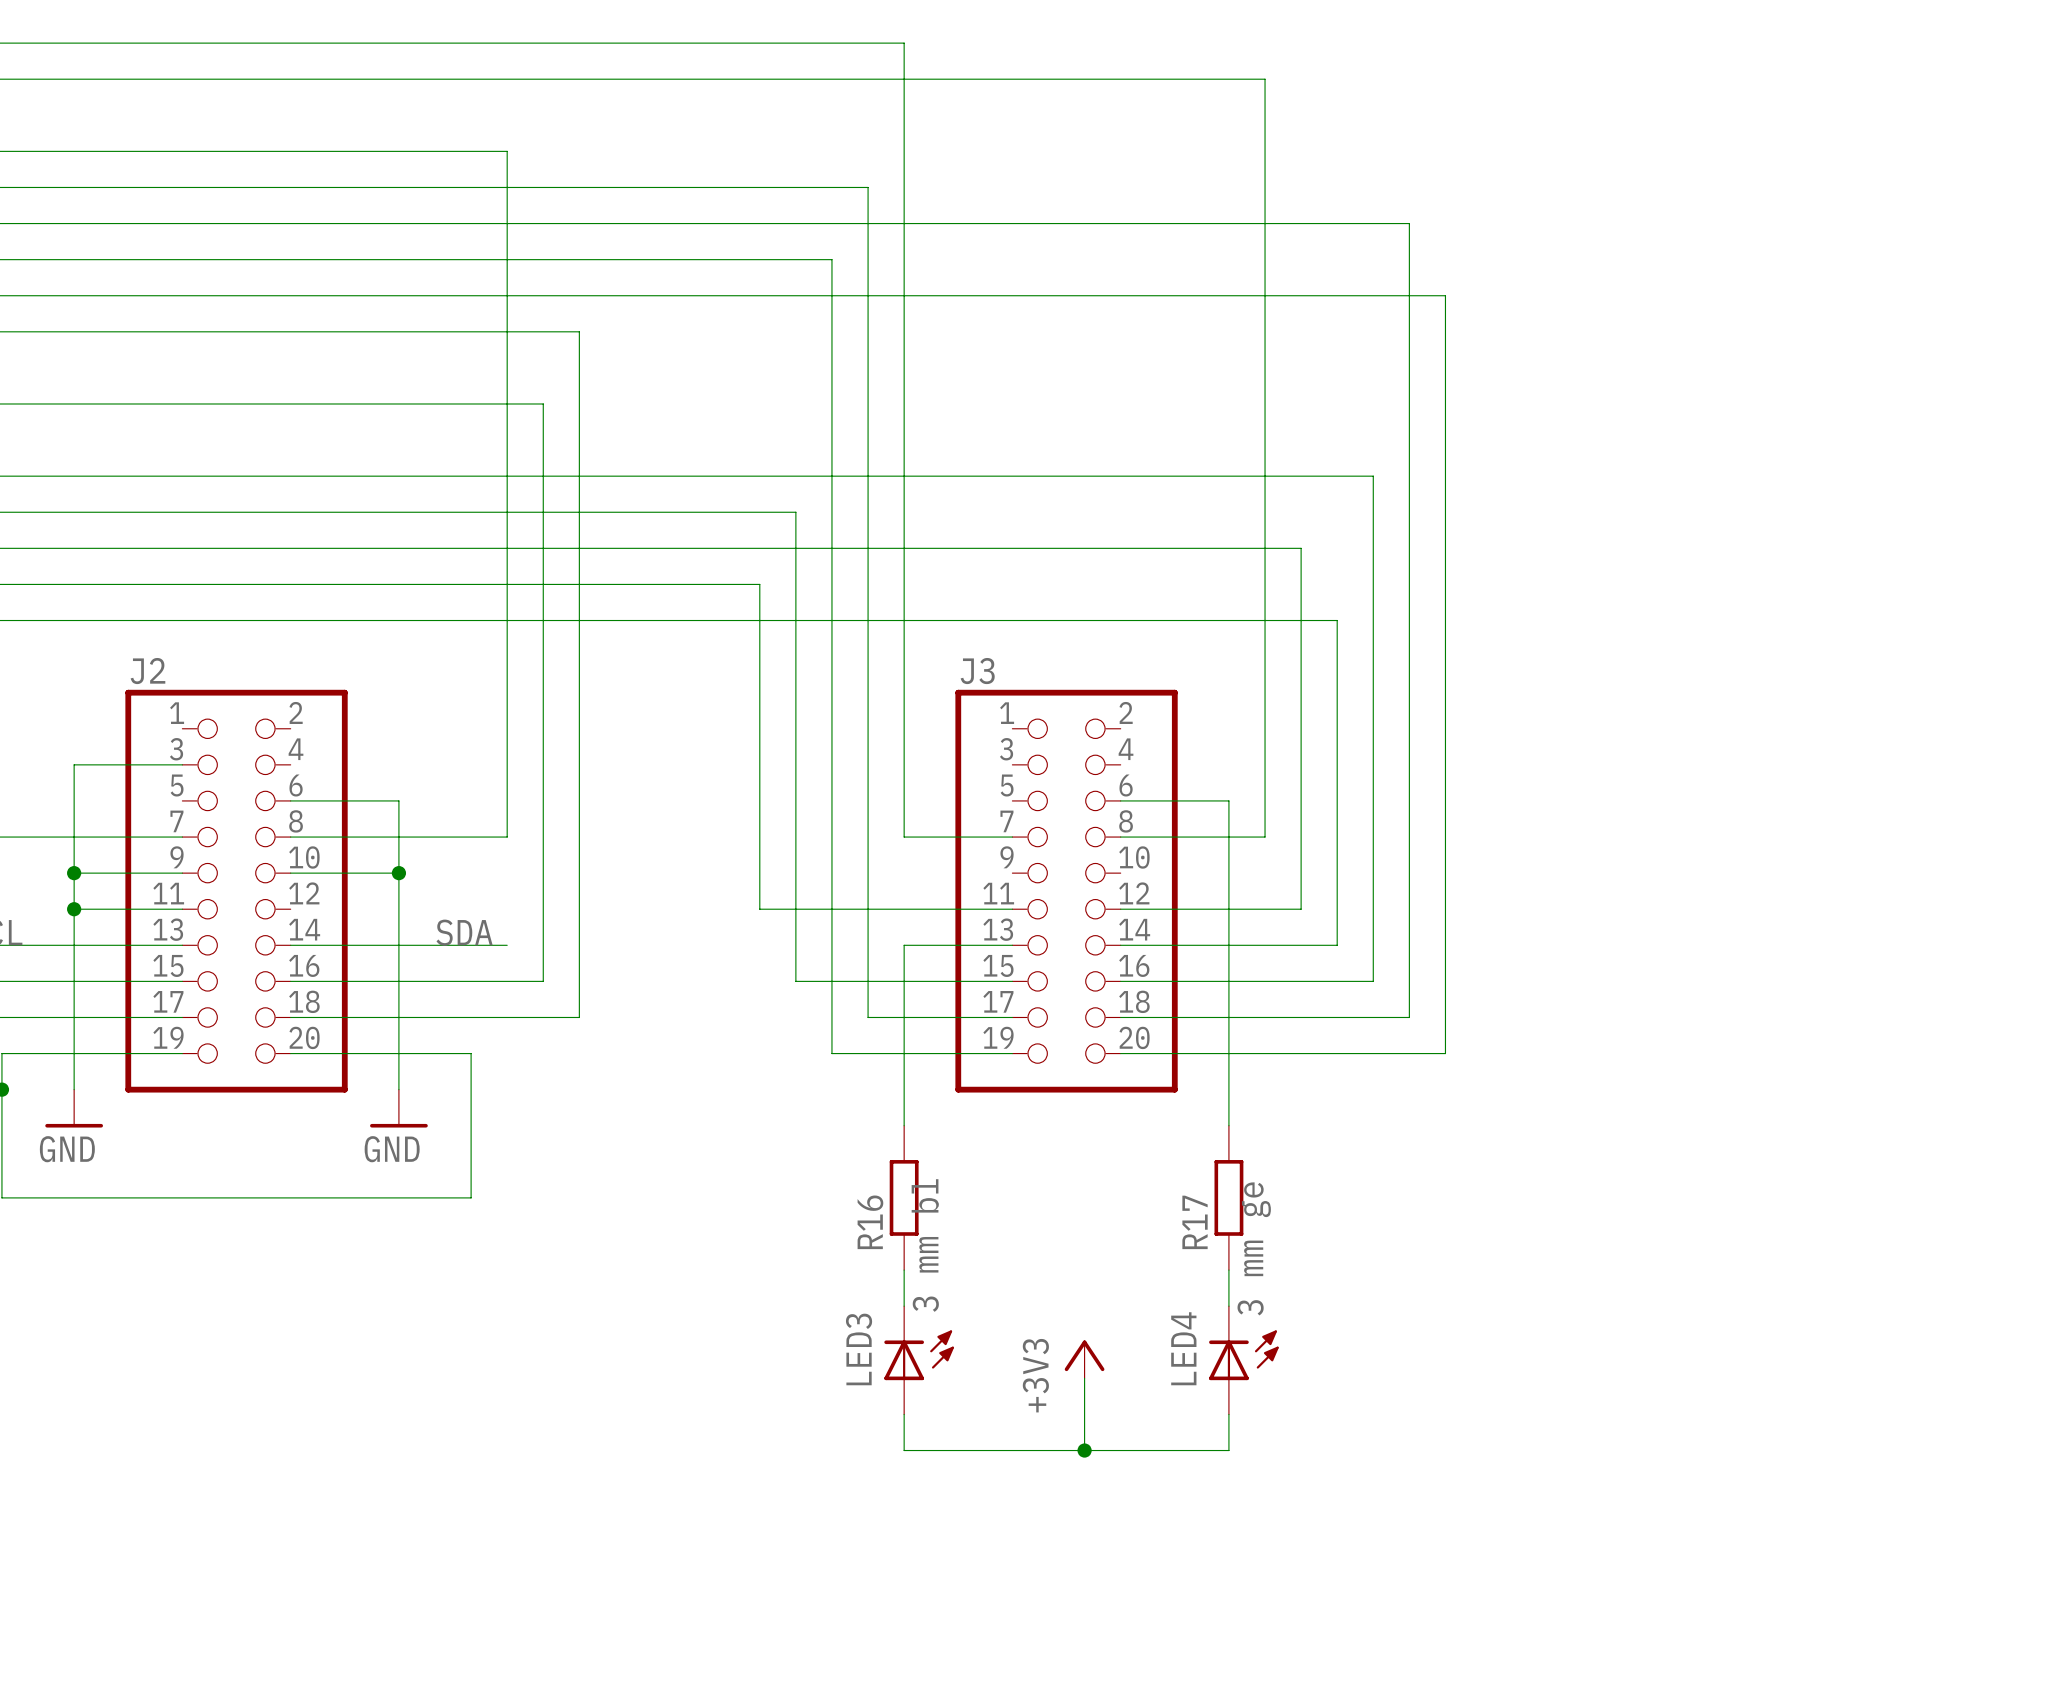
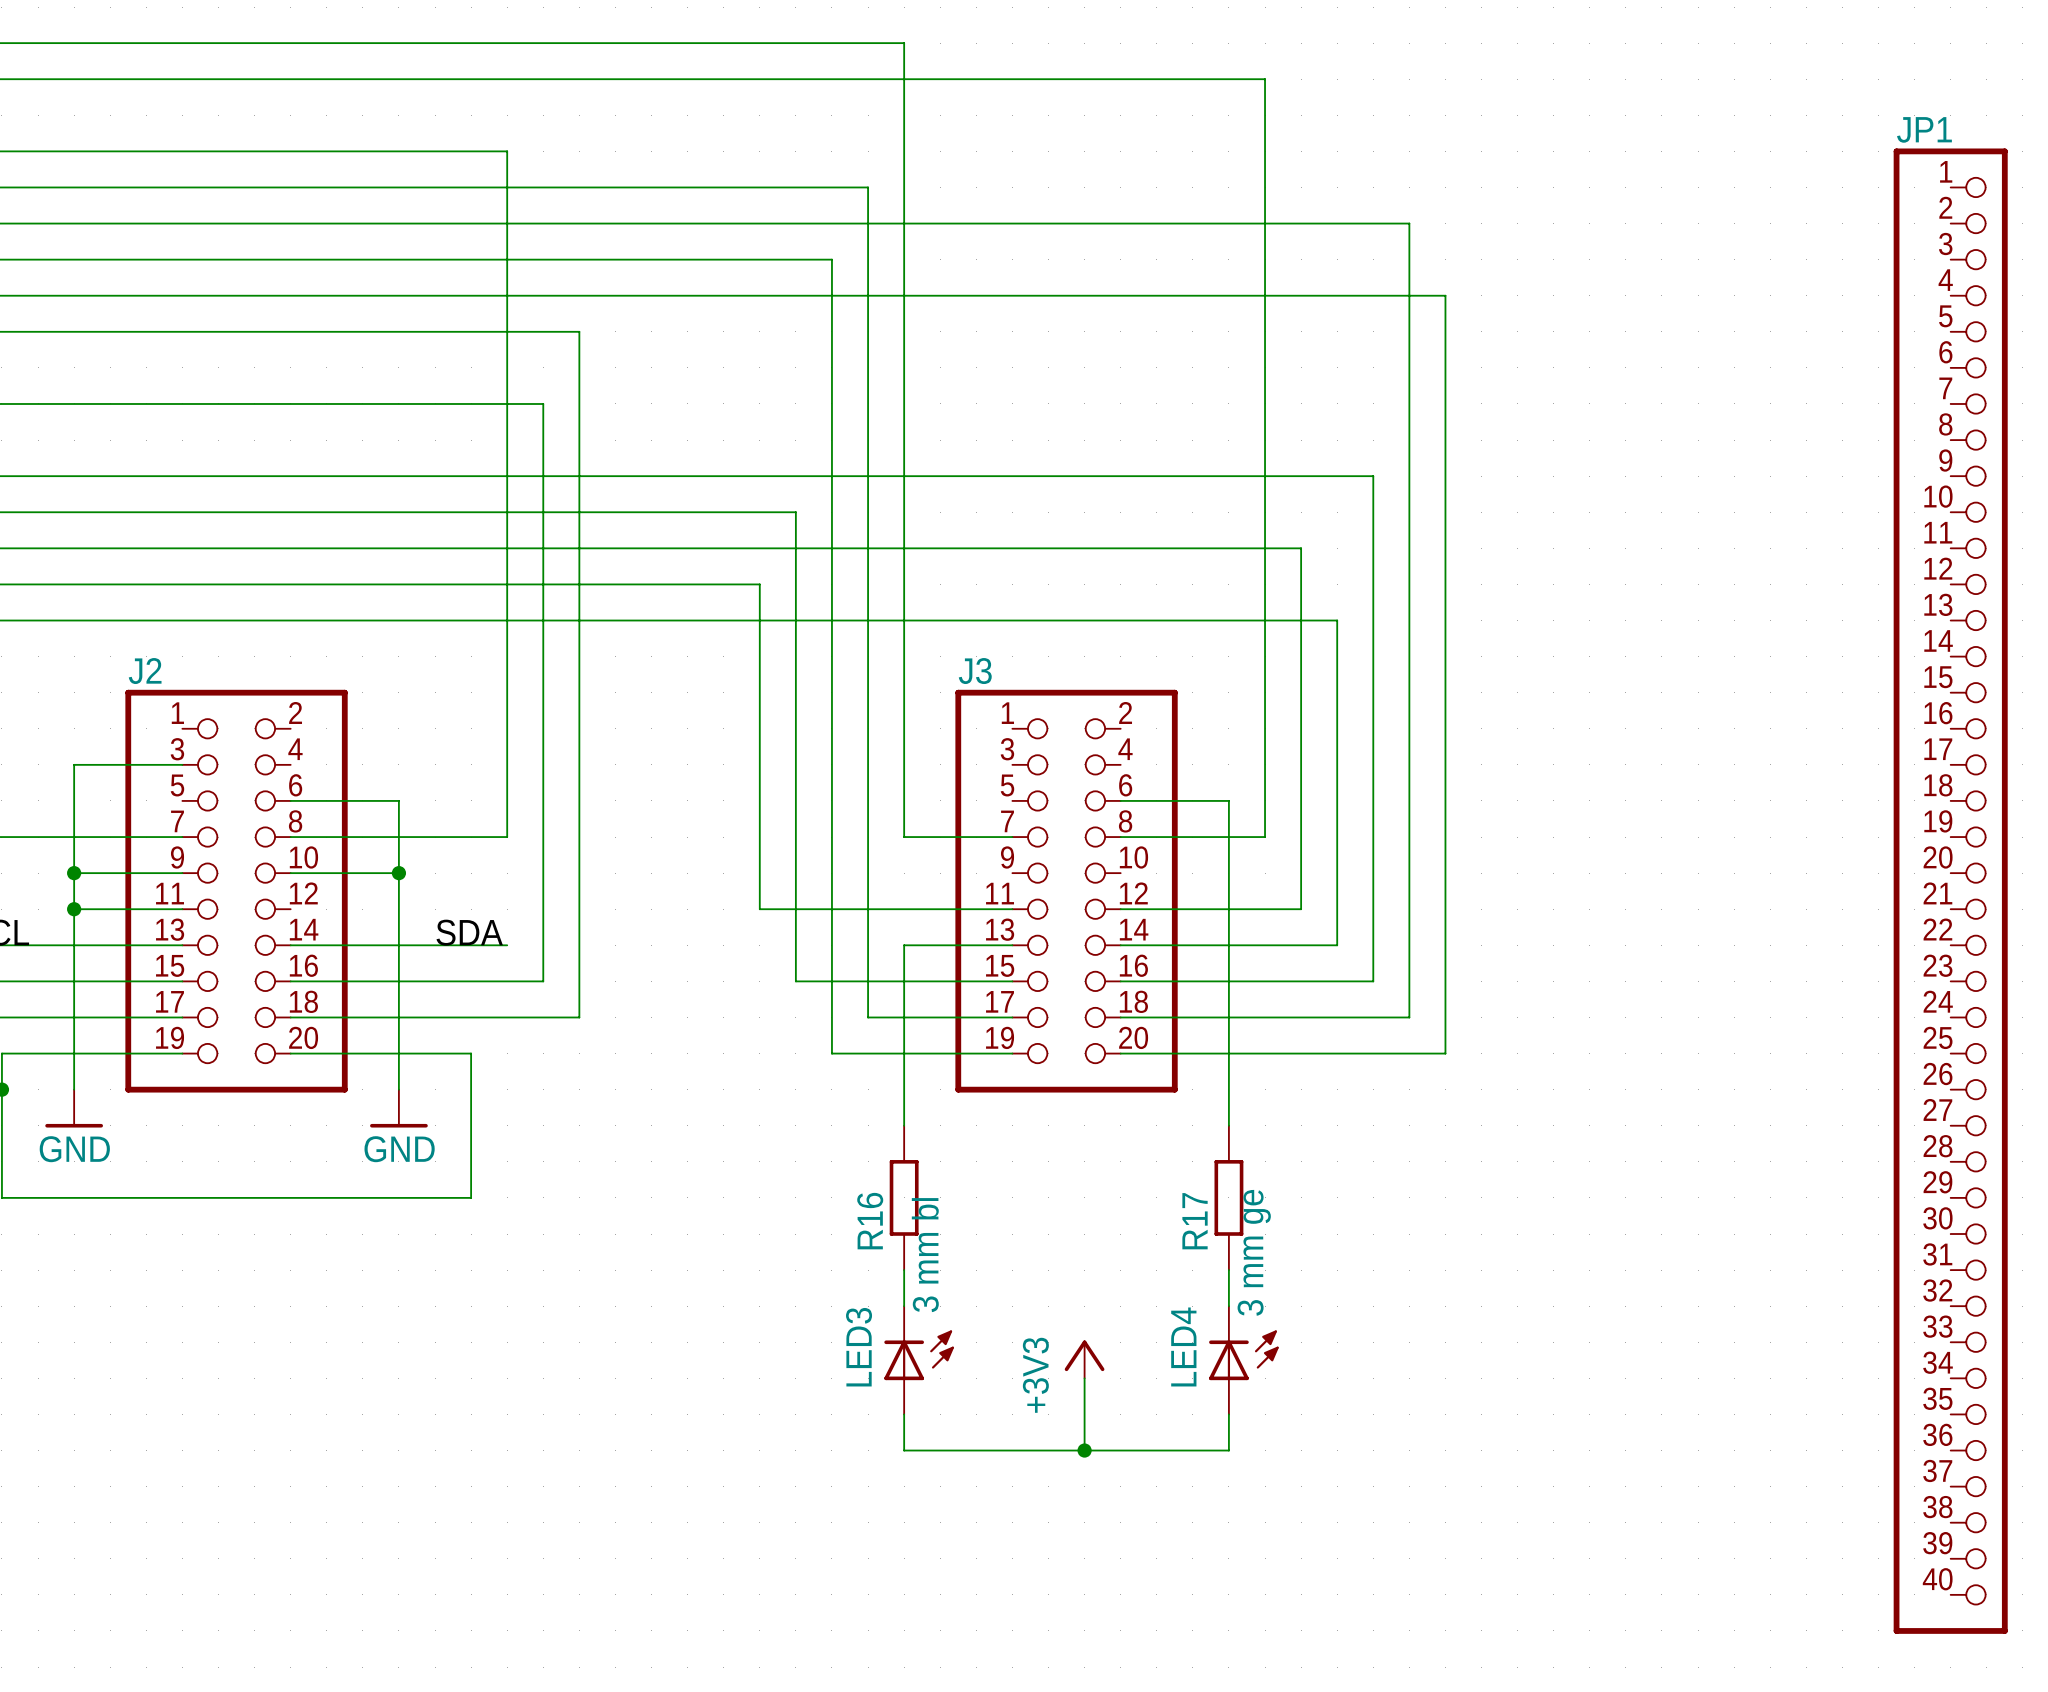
JP1: none -> (1950, 891)

